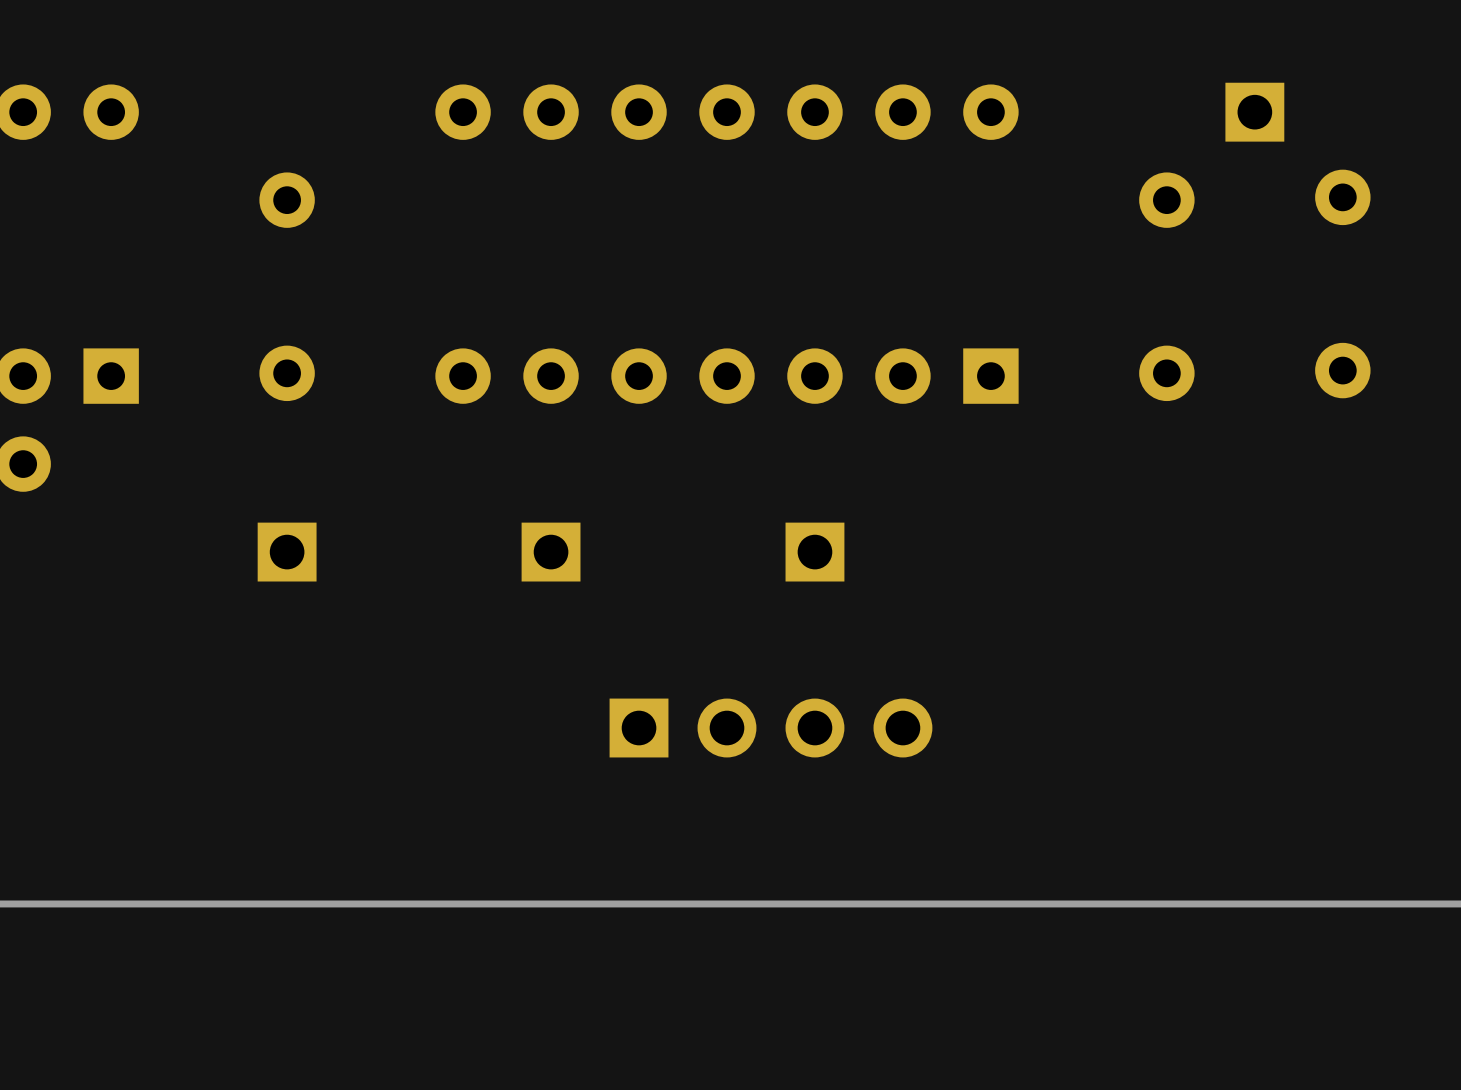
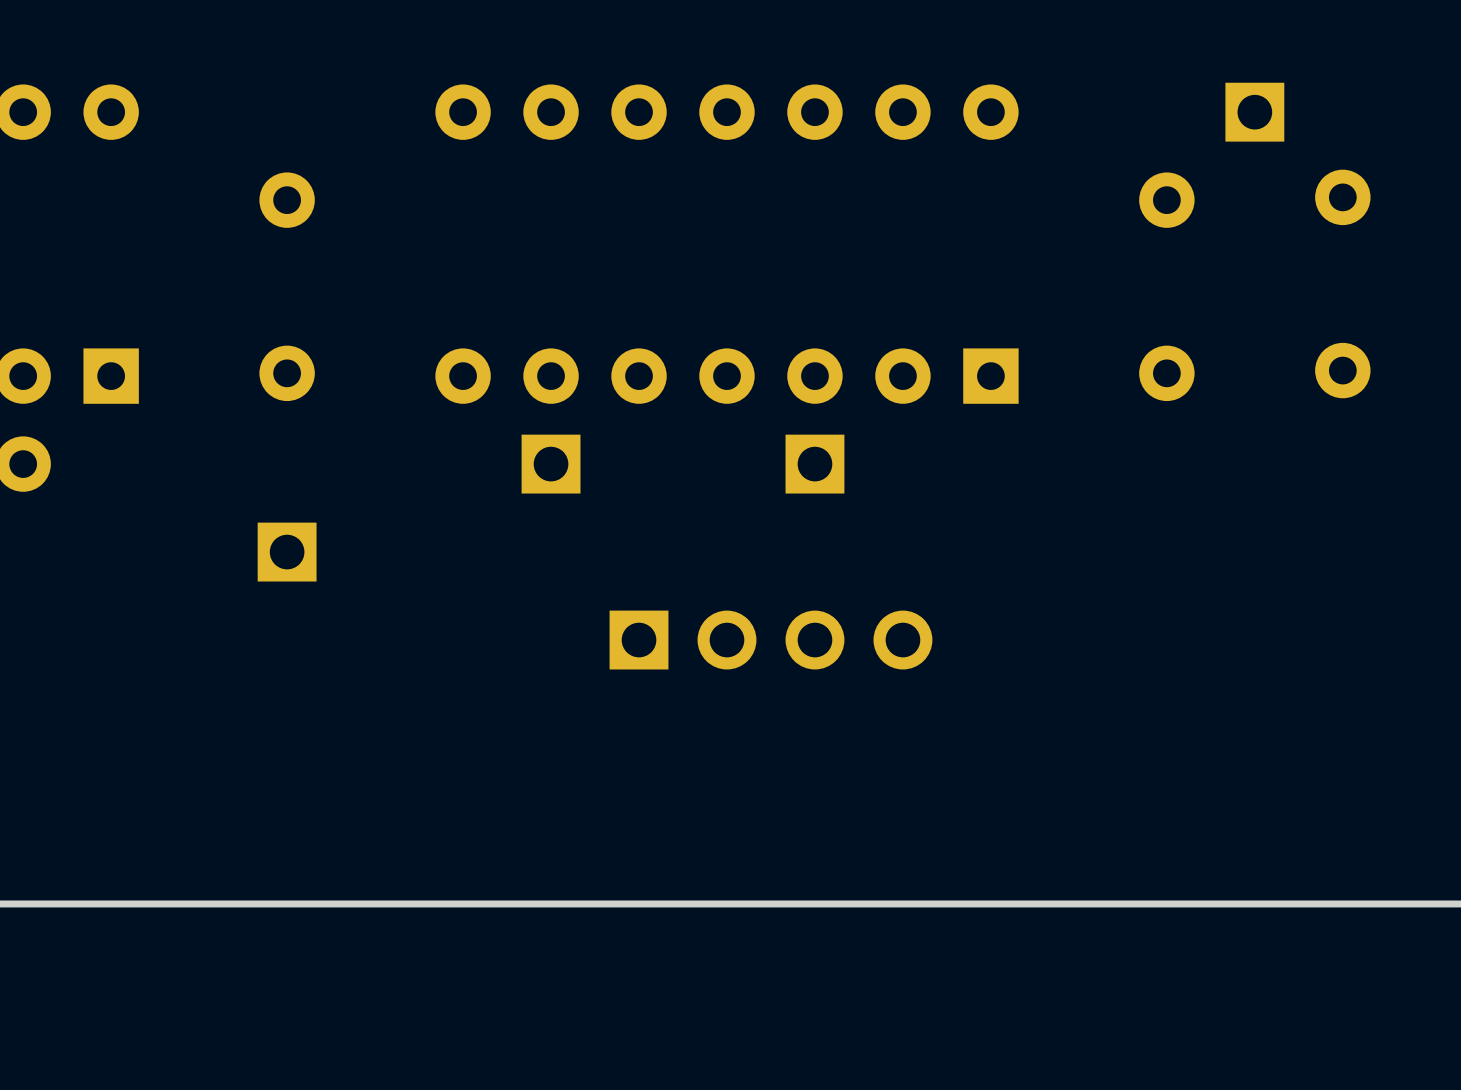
part position: (551, 552) -> (551, 464)
part position: (814, 552) -> (814, 464)
part position: (770, 728) -> (770, 640)

